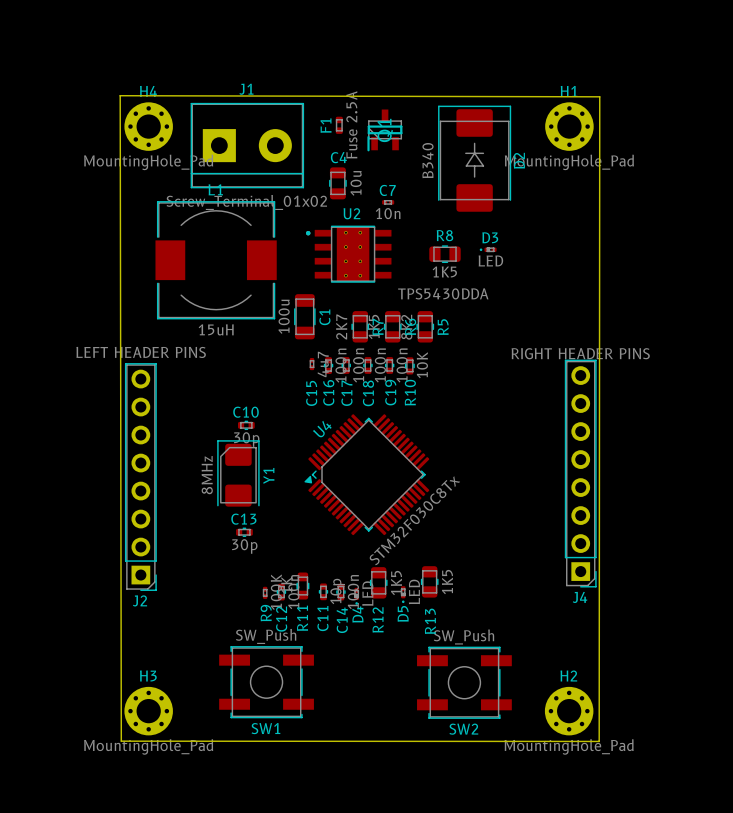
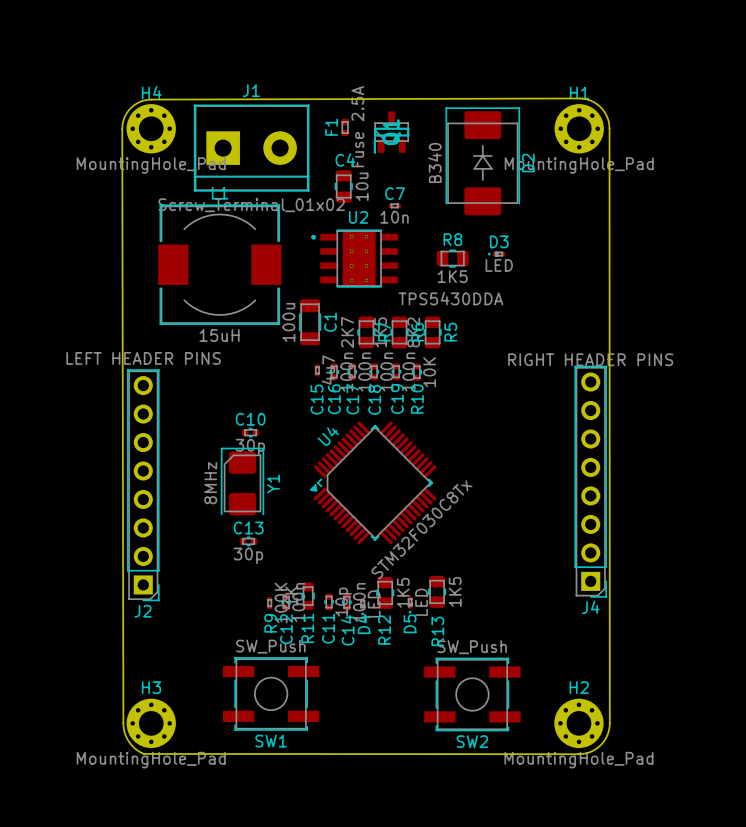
board edge: none -> (580, 98) (591, 100) (600, 107) (607, 117) (609, 128) (609, 723) (608, 733) (600, 745) (592, 751) (578, 754)
board edge: (141, 741) (121, 741) (120, 95) (599, 96) (599, 741) (569, 741) -> (143, 753) (128, 741) (123, 723) (122, 129) (126, 113) (138, 102) (151, 99) (580, 98)

